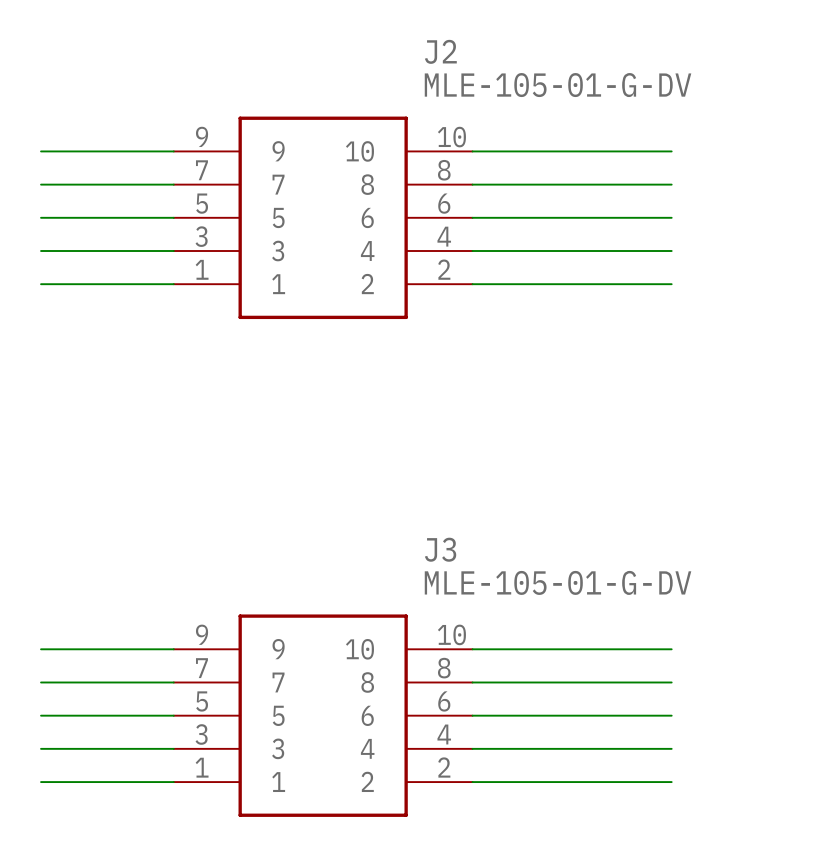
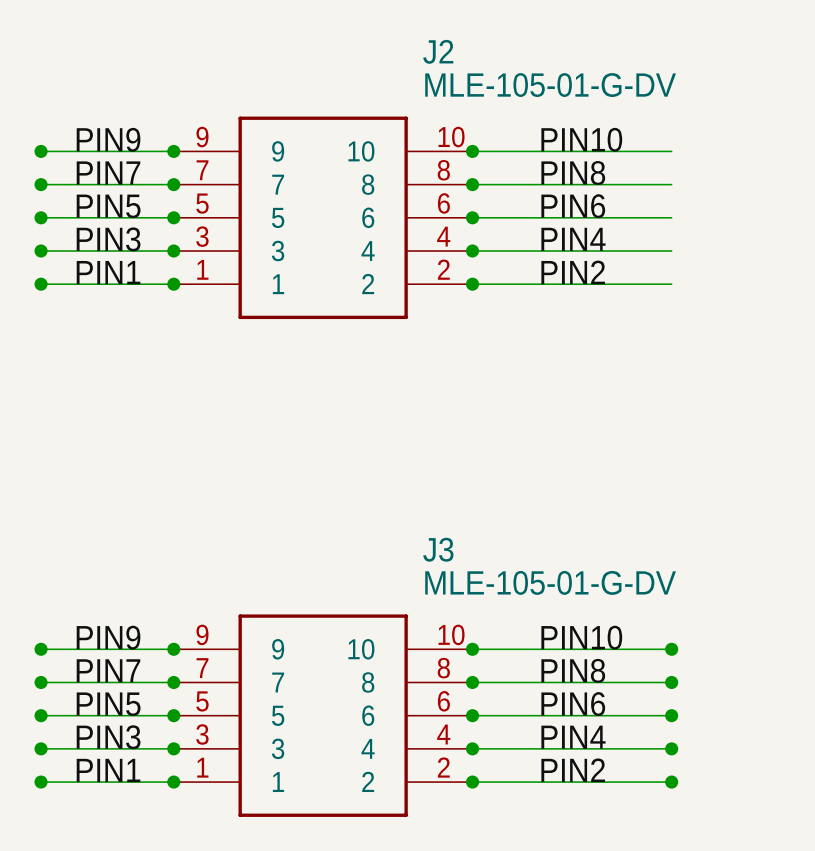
label: none -> PIN9 (108, 139)
label: none -> PIN10 (581, 139)
junction: none -> (41, 151)
junction: none -> (173, 151)
junction: none -> (472, 151)
label: none -> PIN7 (108, 173)
label: none -> PIN8 (573, 172)
junction: none -> (41, 184)
junction: none -> (173, 184)
junction: none -> (472, 184)
label: none -> PIN5 (108, 206)
label: none -> PIN6 (573, 206)
junction: none -> (41, 217)
junction: none -> (173, 217)
junction: none -> (472, 217)
label: none -> PIN3 (108, 239)
label: none -> PIN4 (573, 239)
junction: none -> (41, 251)
junction: none -> (173, 251)
junction: none -> (472, 251)
label: none -> PIN1 (108, 272)
label: none -> PIN2 (573, 272)
junction: none -> (41, 284)
junction: none -> (173, 284)
junction: none -> (472, 284)
label: none -> PIN9 (108, 637)
label: none -> PIN10 (581, 637)
junction: none -> (41, 649)
junction: none -> (173, 649)
junction: none -> (472, 649)
junction: none -> (671, 649)
label: none -> PIN7 (108, 670)
label: none -> PIN8 (573, 670)
junction: none -> (41, 682)
junction: none -> (173, 682)
junction: none -> (472, 682)
junction: none -> (671, 682)
label: none -> PIN5 (108, 704)
label: none -> PIN6 (573, 704)
junction: none -> (41, 715)
junction: none -> (173, 715)
junction: none -> (472, 715)
junction: none -> (671, 715)
label: none -> PIN3 (108, 737)
label: none -> PIN4 (573, 737)
junction: none -> (41, 748)
junction: none -> (173, 748)
junction: none -> (472, 748)
junction: none -> (671, 748)
label: none -> PIN1 (108, 770)
label: none -> PIN2 (573, 770)
junction: none -> (41, 782)
junction: none -> (173, 782)
junction: none -> (472, 782)
junction: none -> (671, 782)

